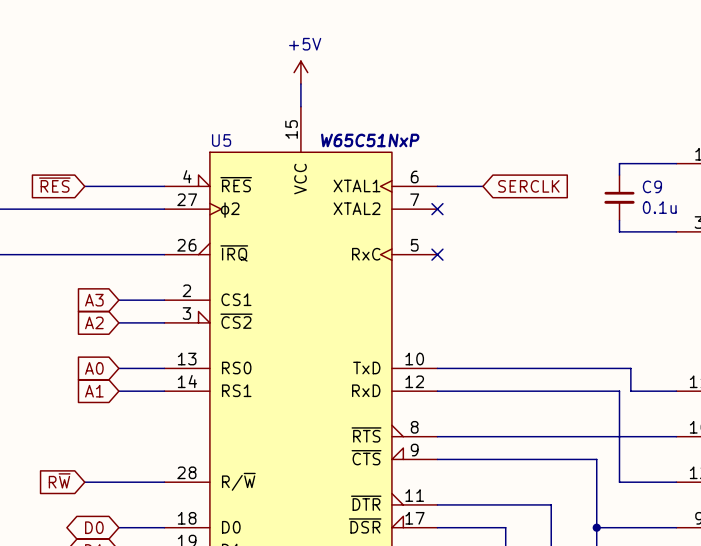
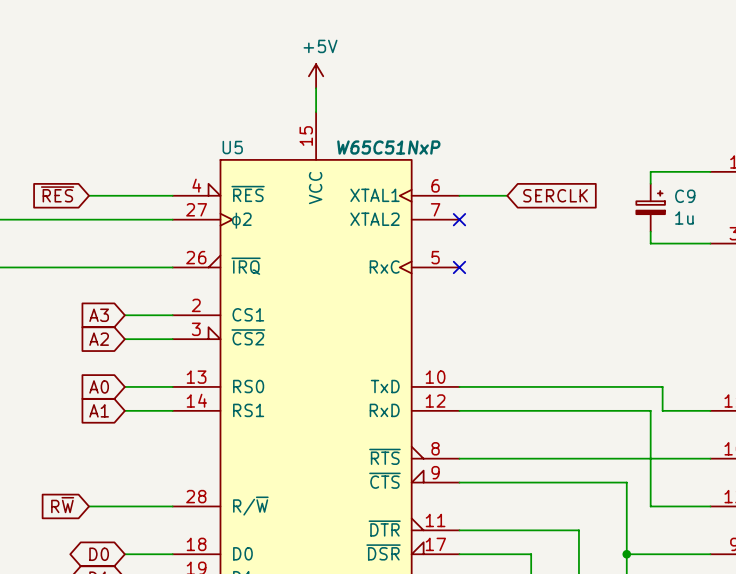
C9 symbol: [604, 175, 635, 221] -> [636, 183, 666, 232]
C9 value: 0.1u (659, 207) -> 1u (684, 218)

